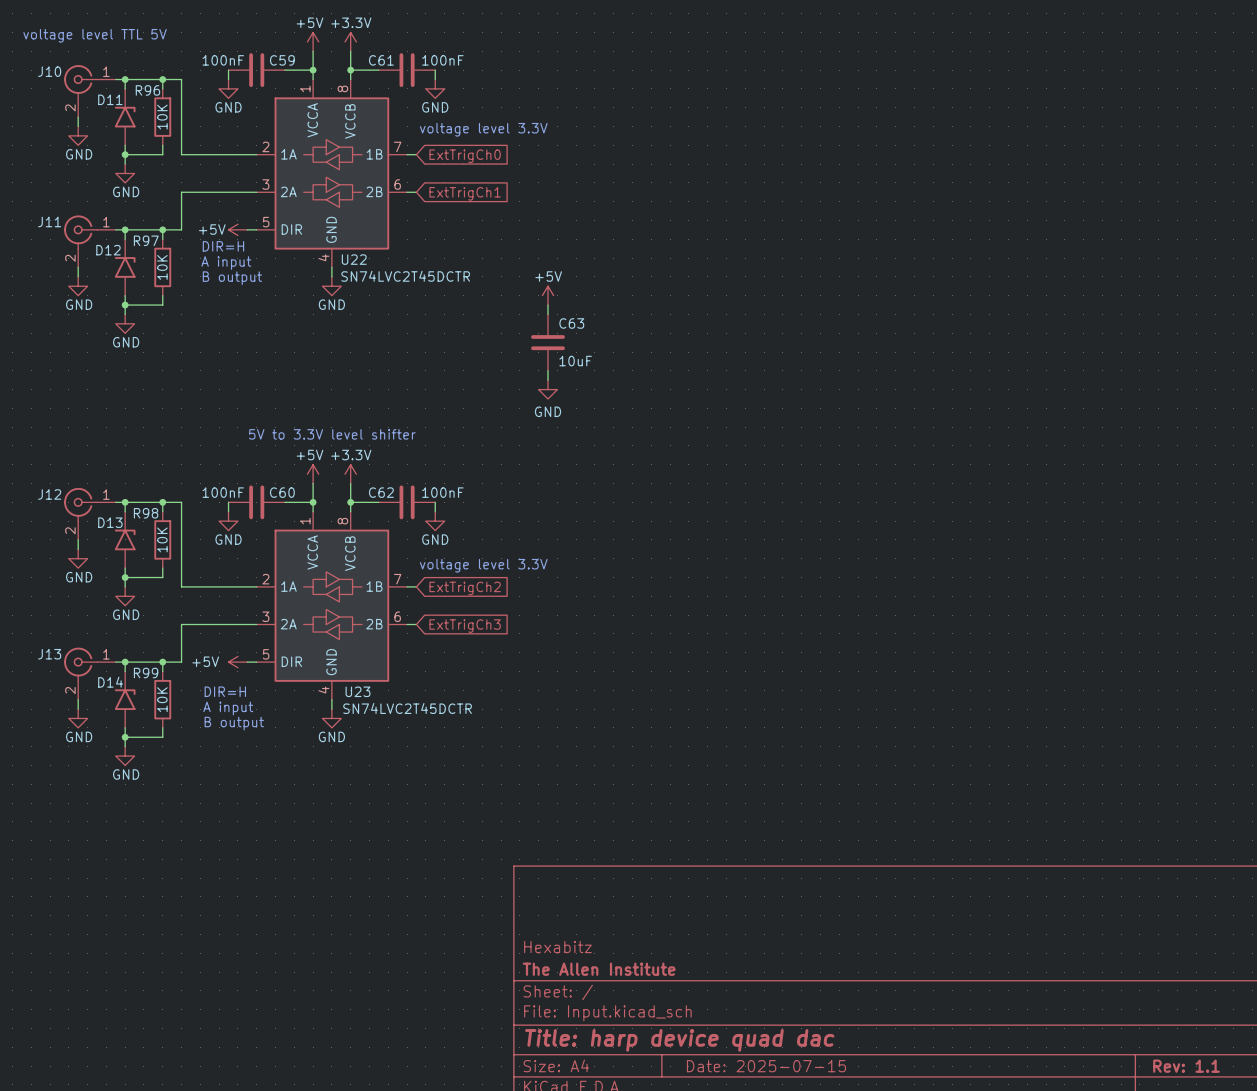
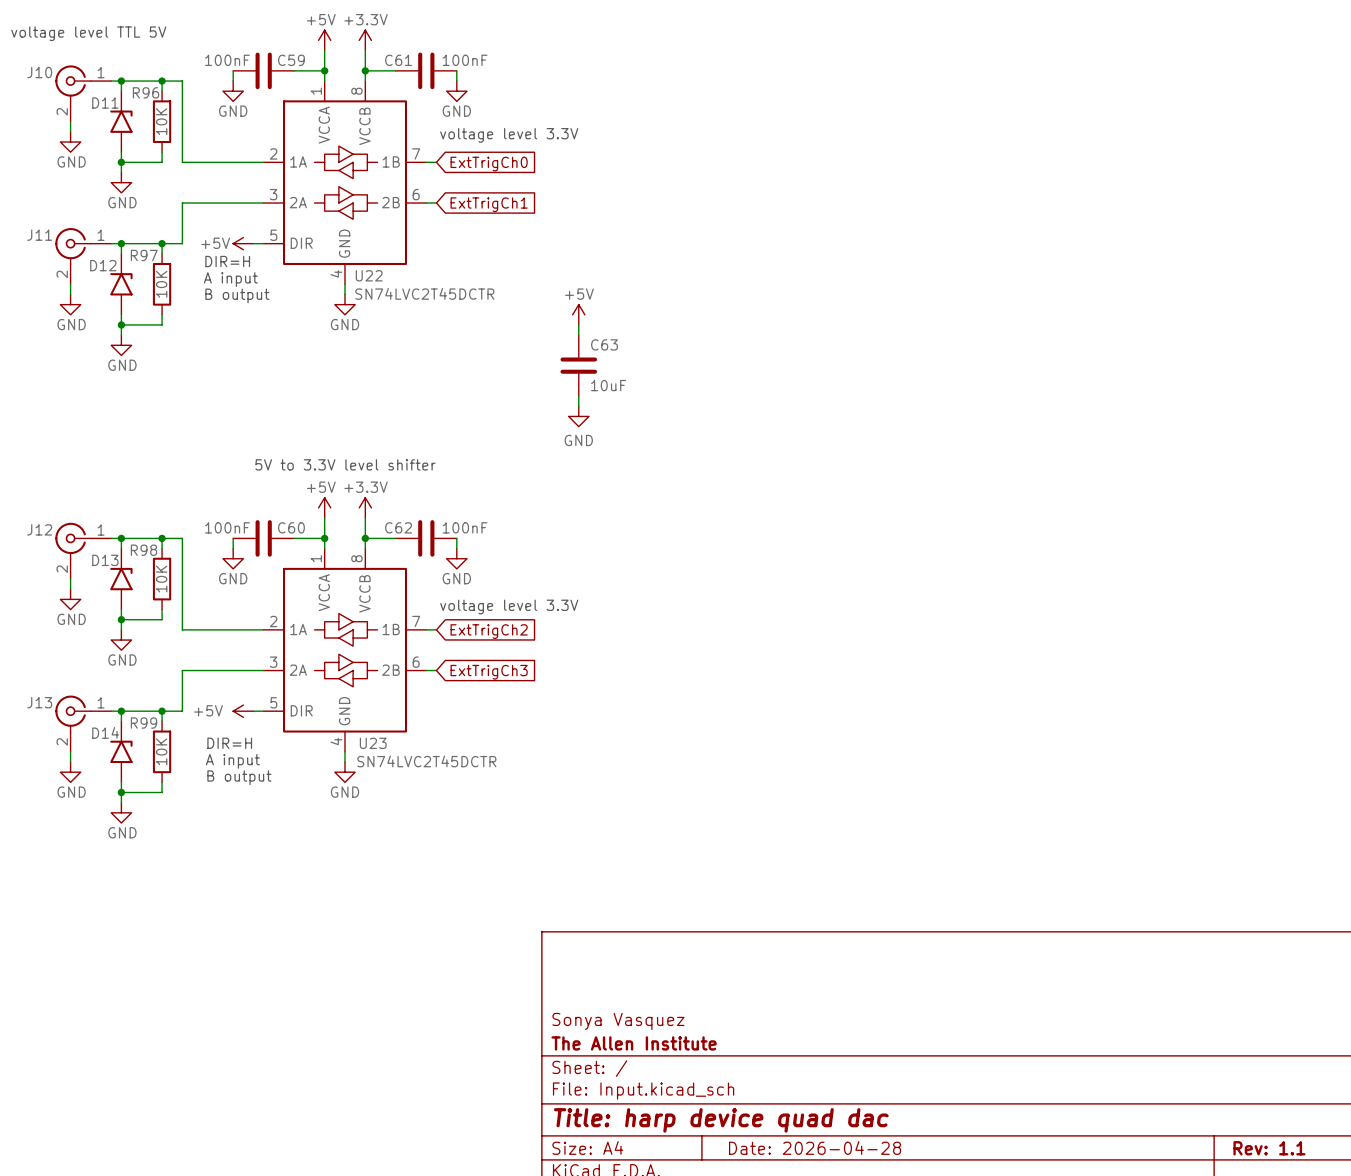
title block: Hexabitz (557, 947) -> Sonya Vasquez (618, 1021)
title block: Date: 2025-07-15 (766, 1066) -> Date: 2026-04-28 (815, 1147)

